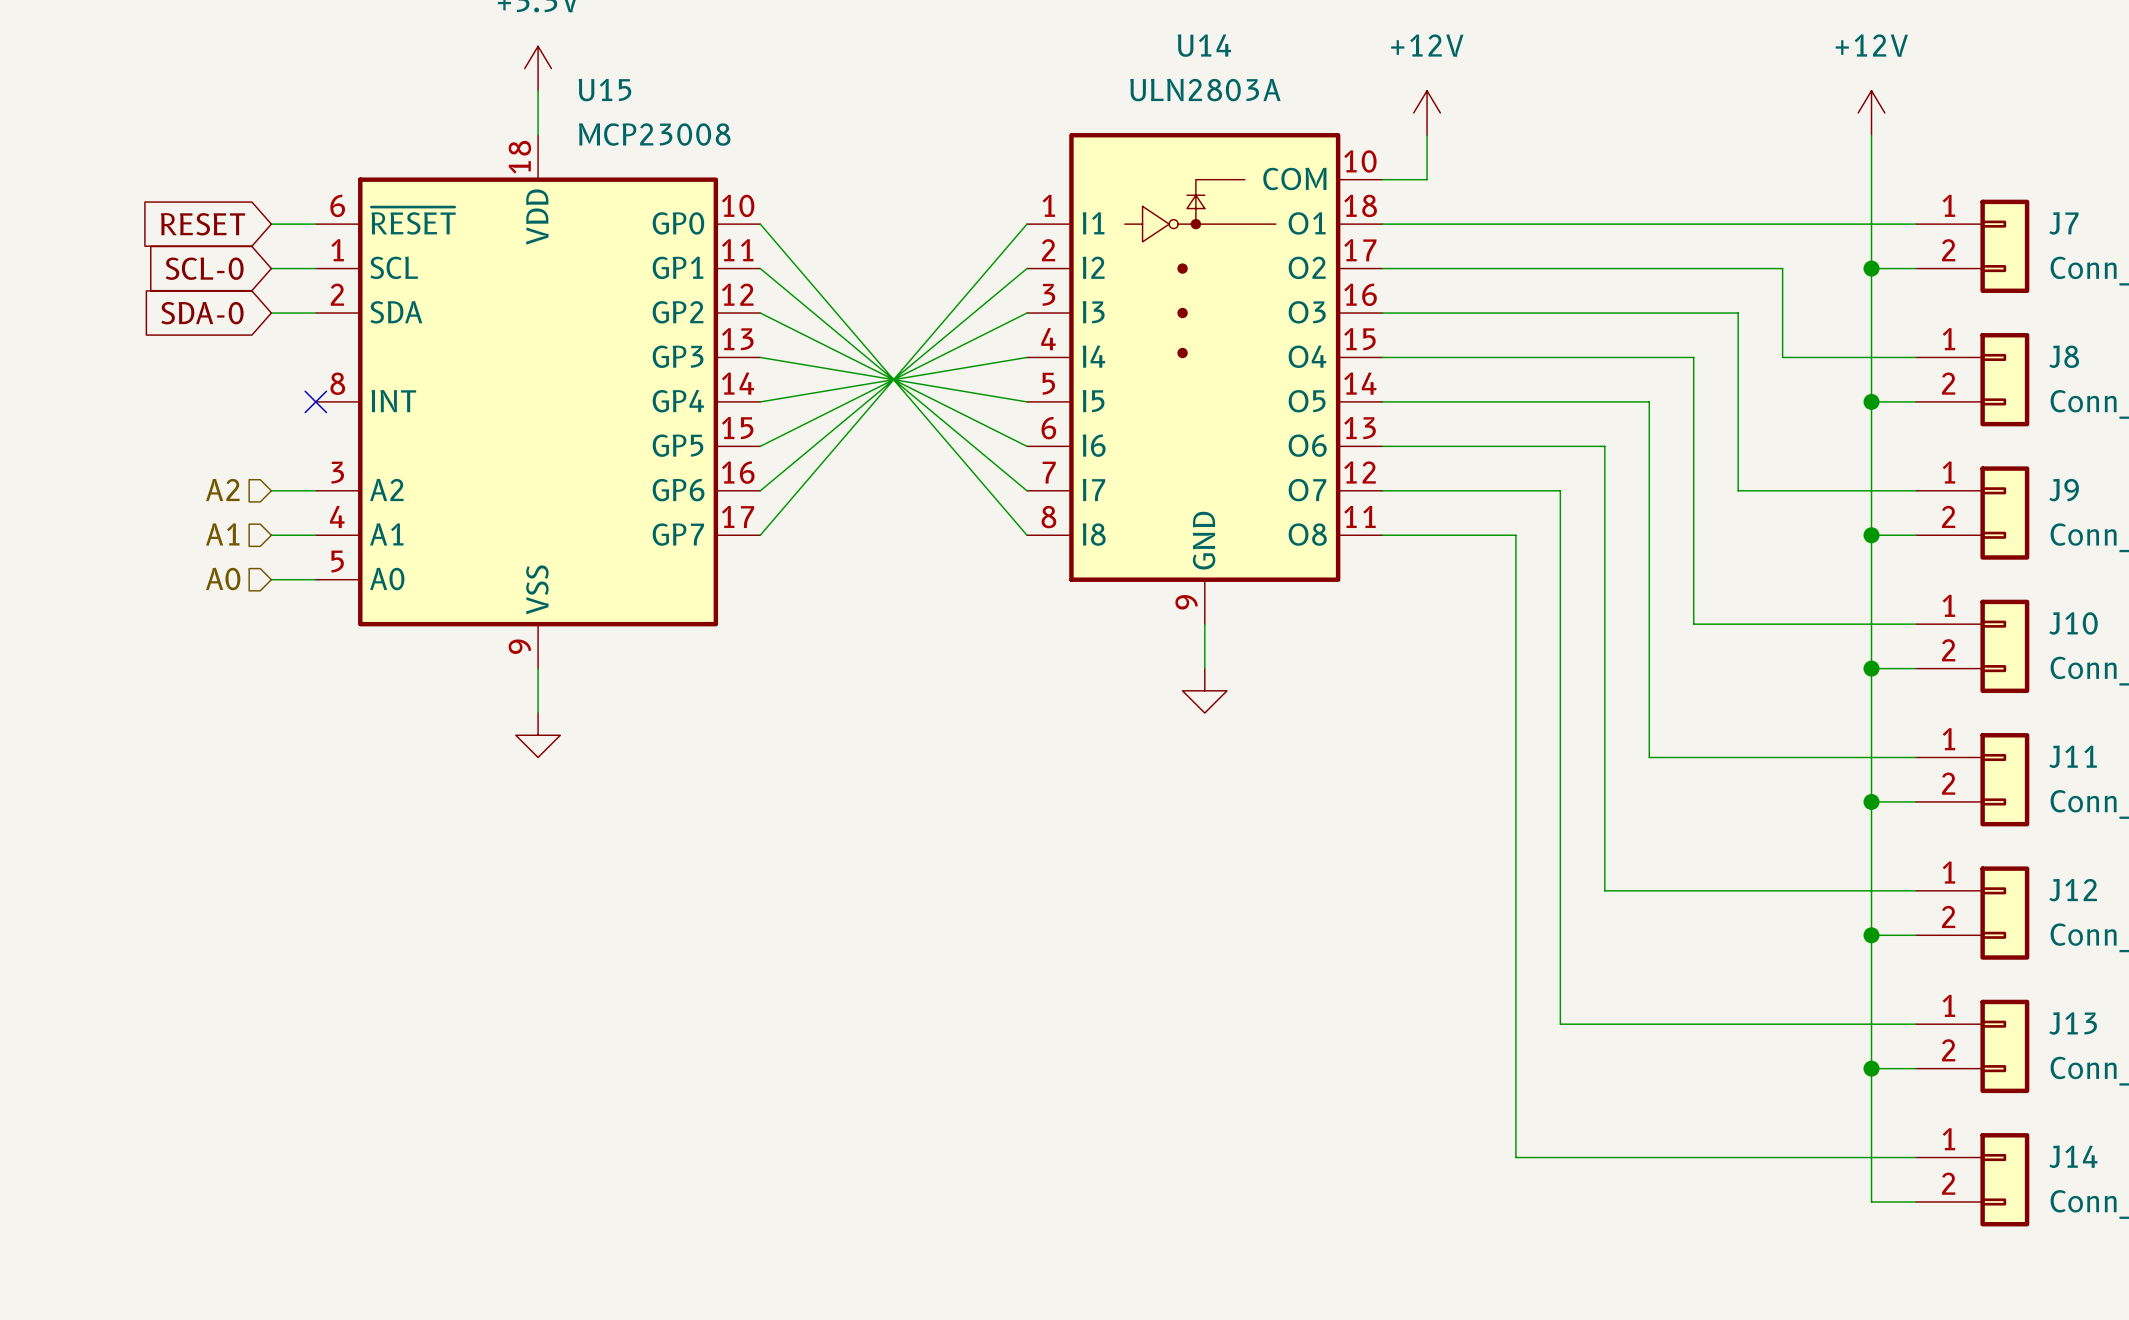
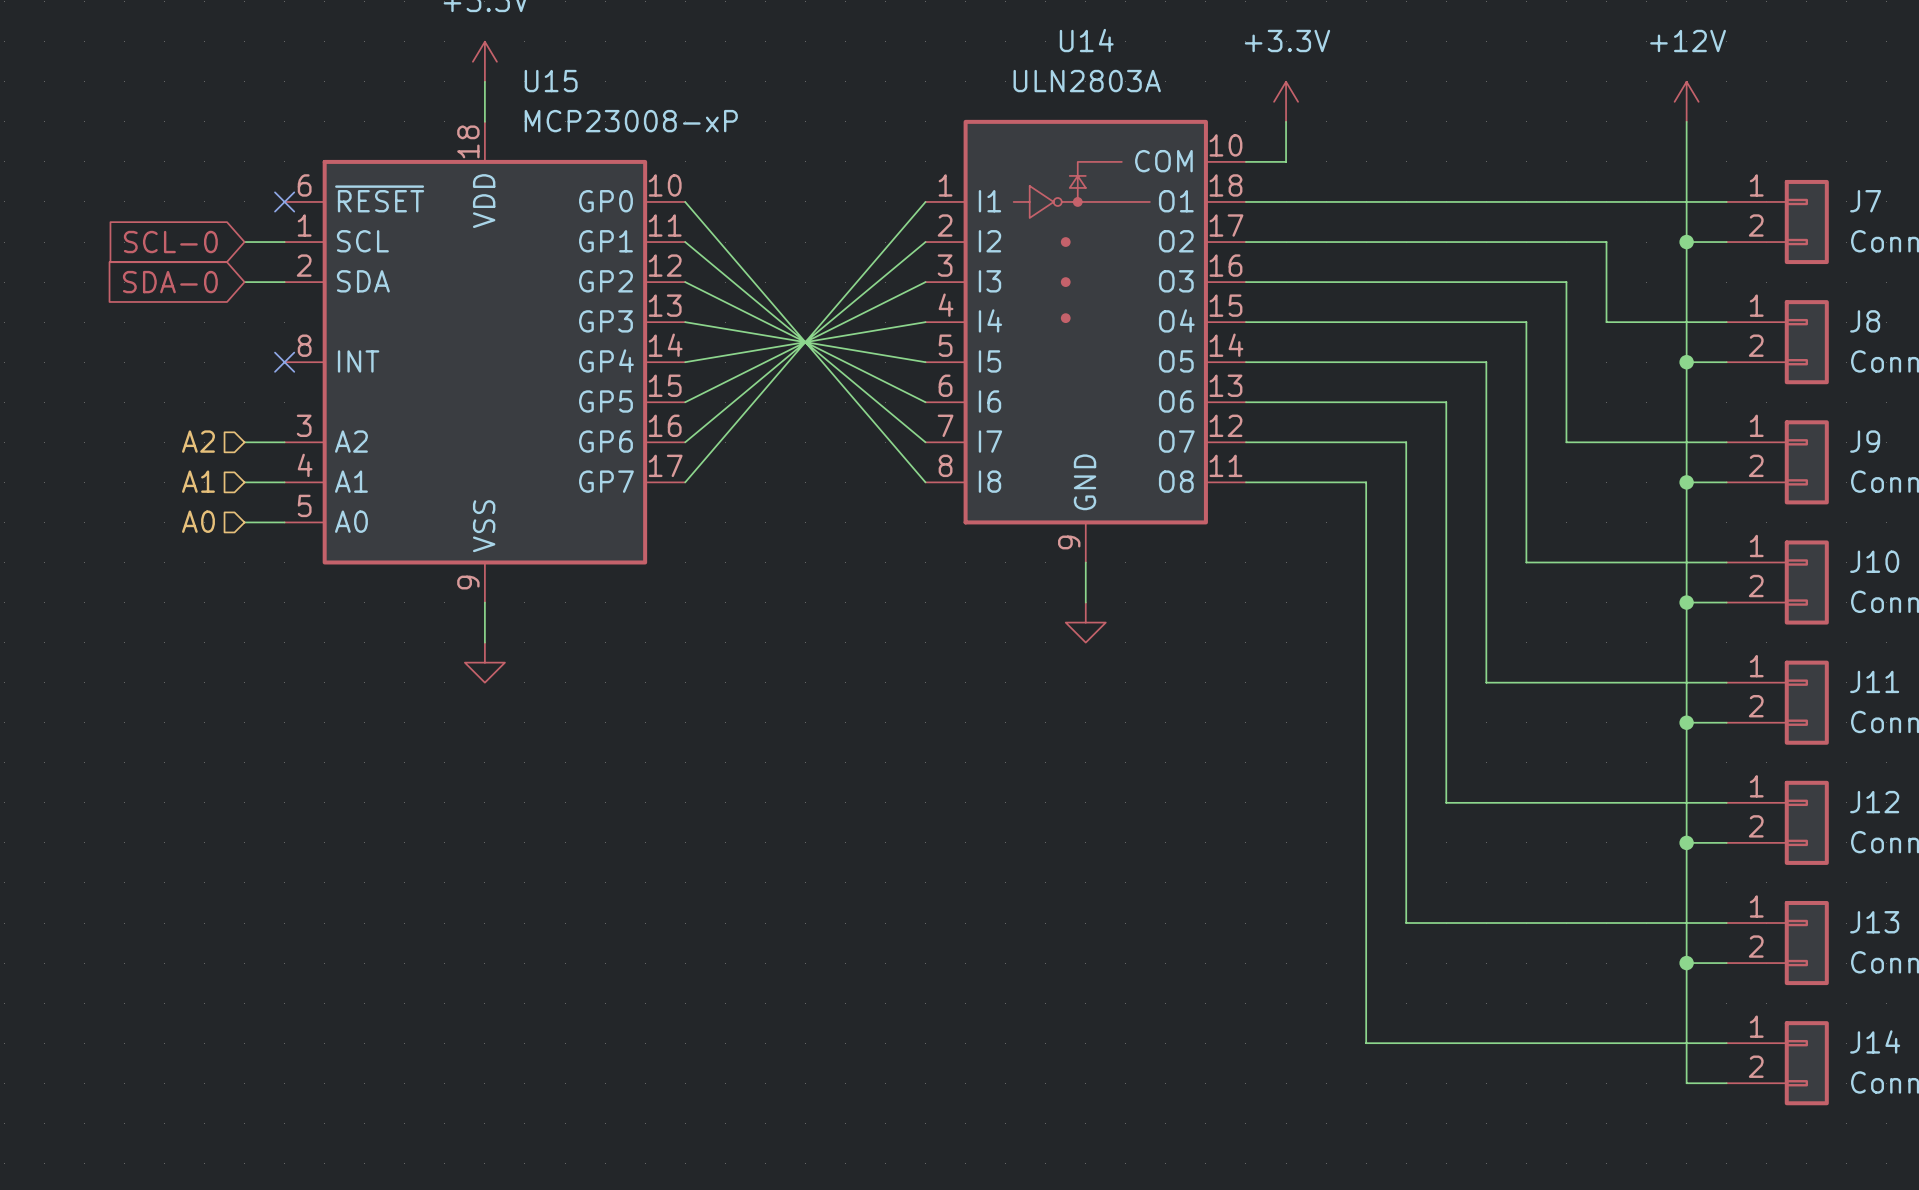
power symbol: +12V (1427, 112) -> +3.3V (1286, 101)
U15 value: MCP23008 (654, 134) -> MCP23008-xP (631, 121)
global label: RESET (203, 224) -> none
wire: (271, 224) (315, 224) -> none
no-connect mark: none -> (284, 201)

